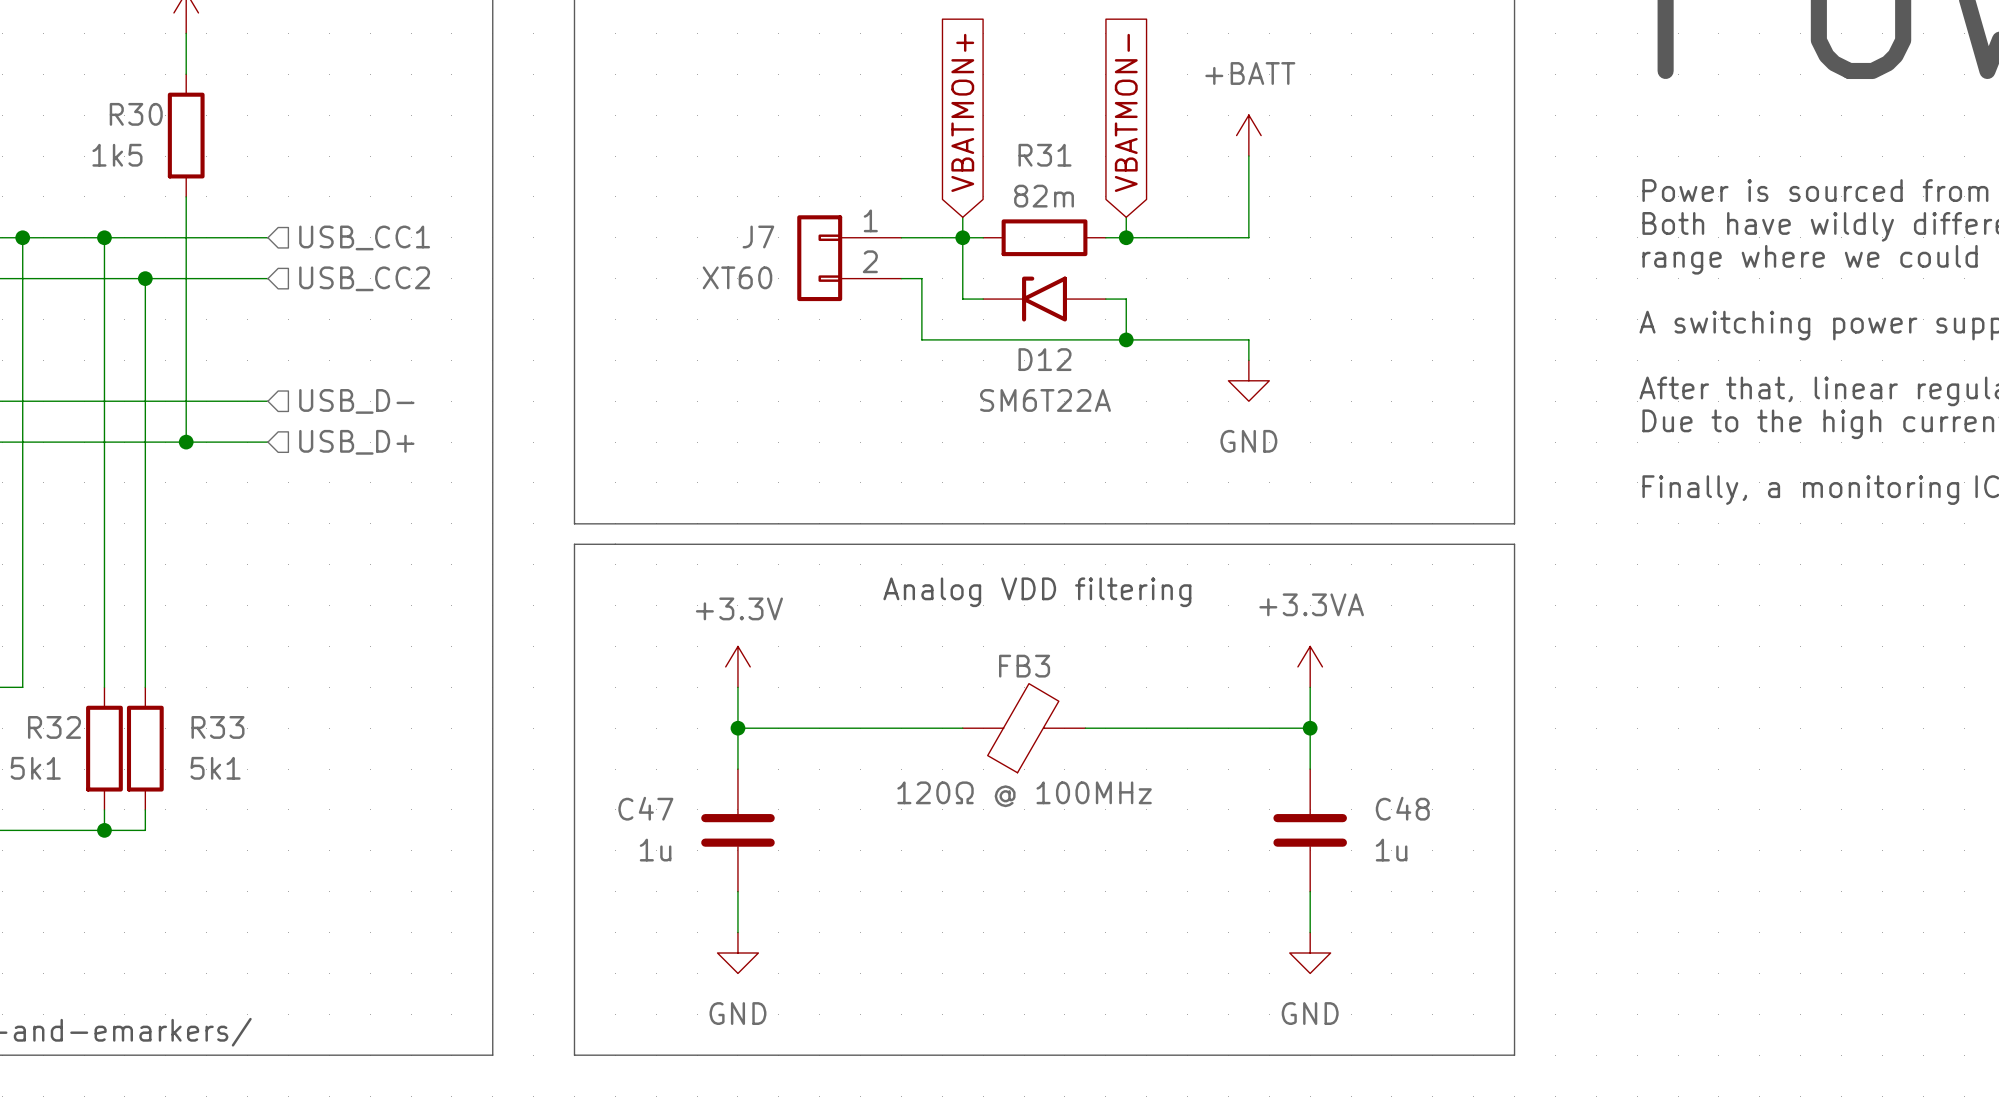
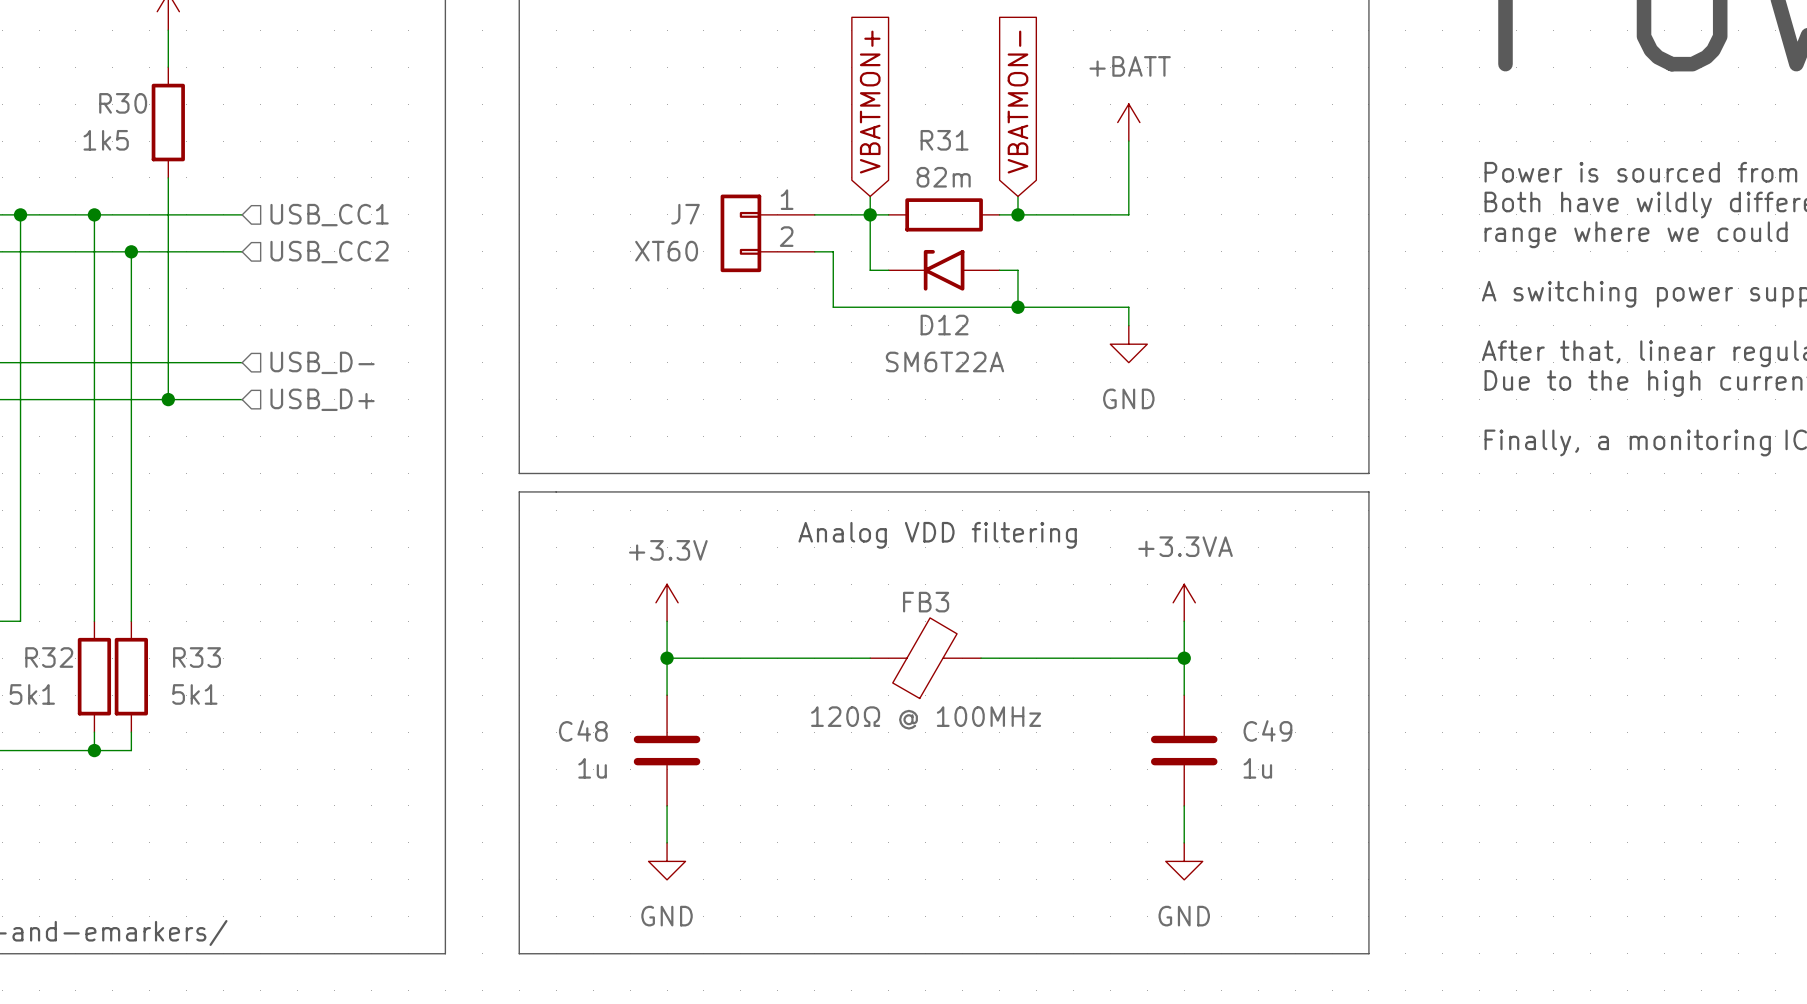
C47 name: C47 (645, 808) -> C48 (583, 730)
C48 name: C48 (1402, 808) -> C49 (1267, 730)

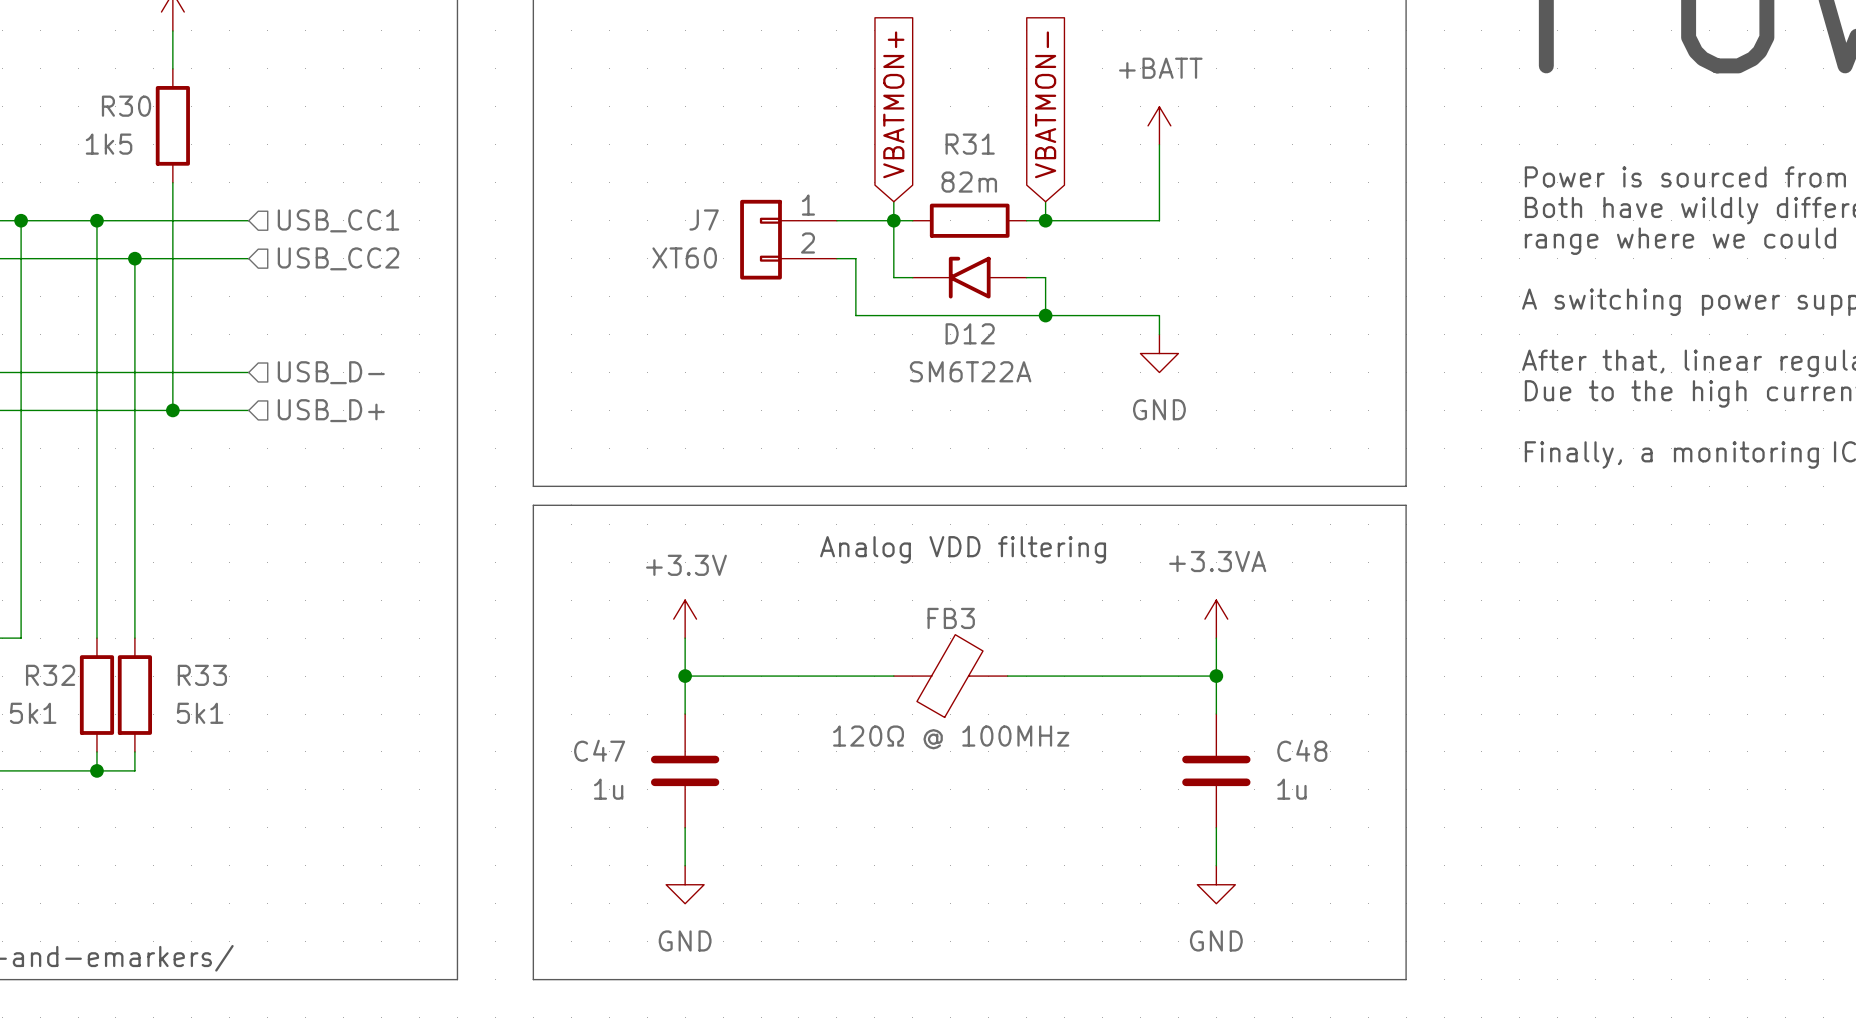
C48 name: C48 (583, 730) -> C47 (599, 750)
C49 name: C49 (1267, 730) -> C48 (1302, 750)

